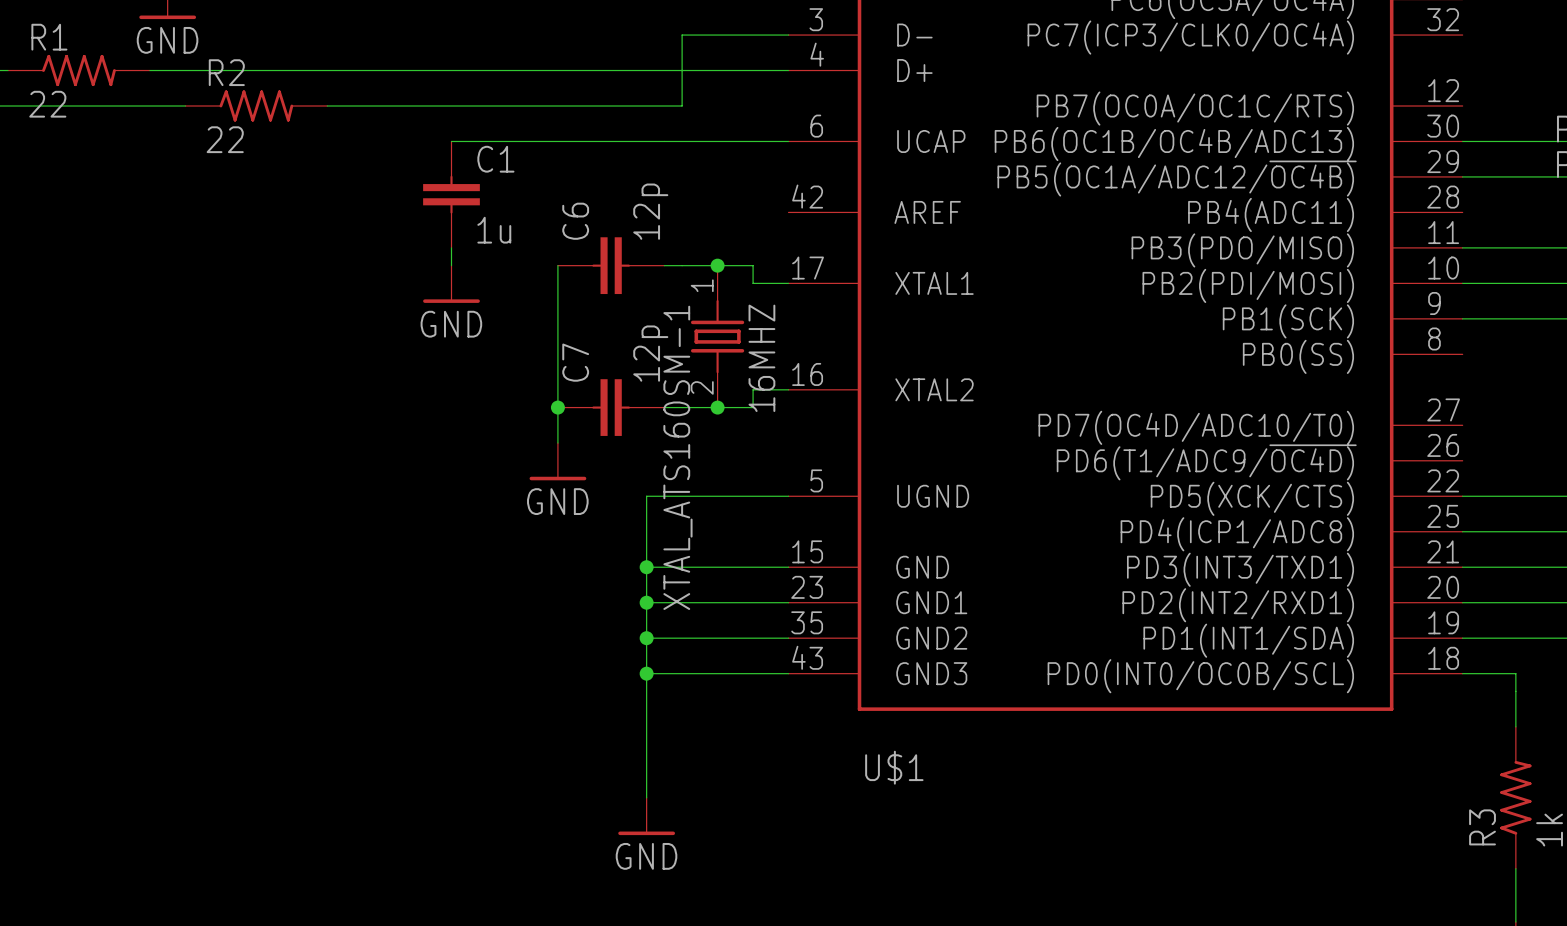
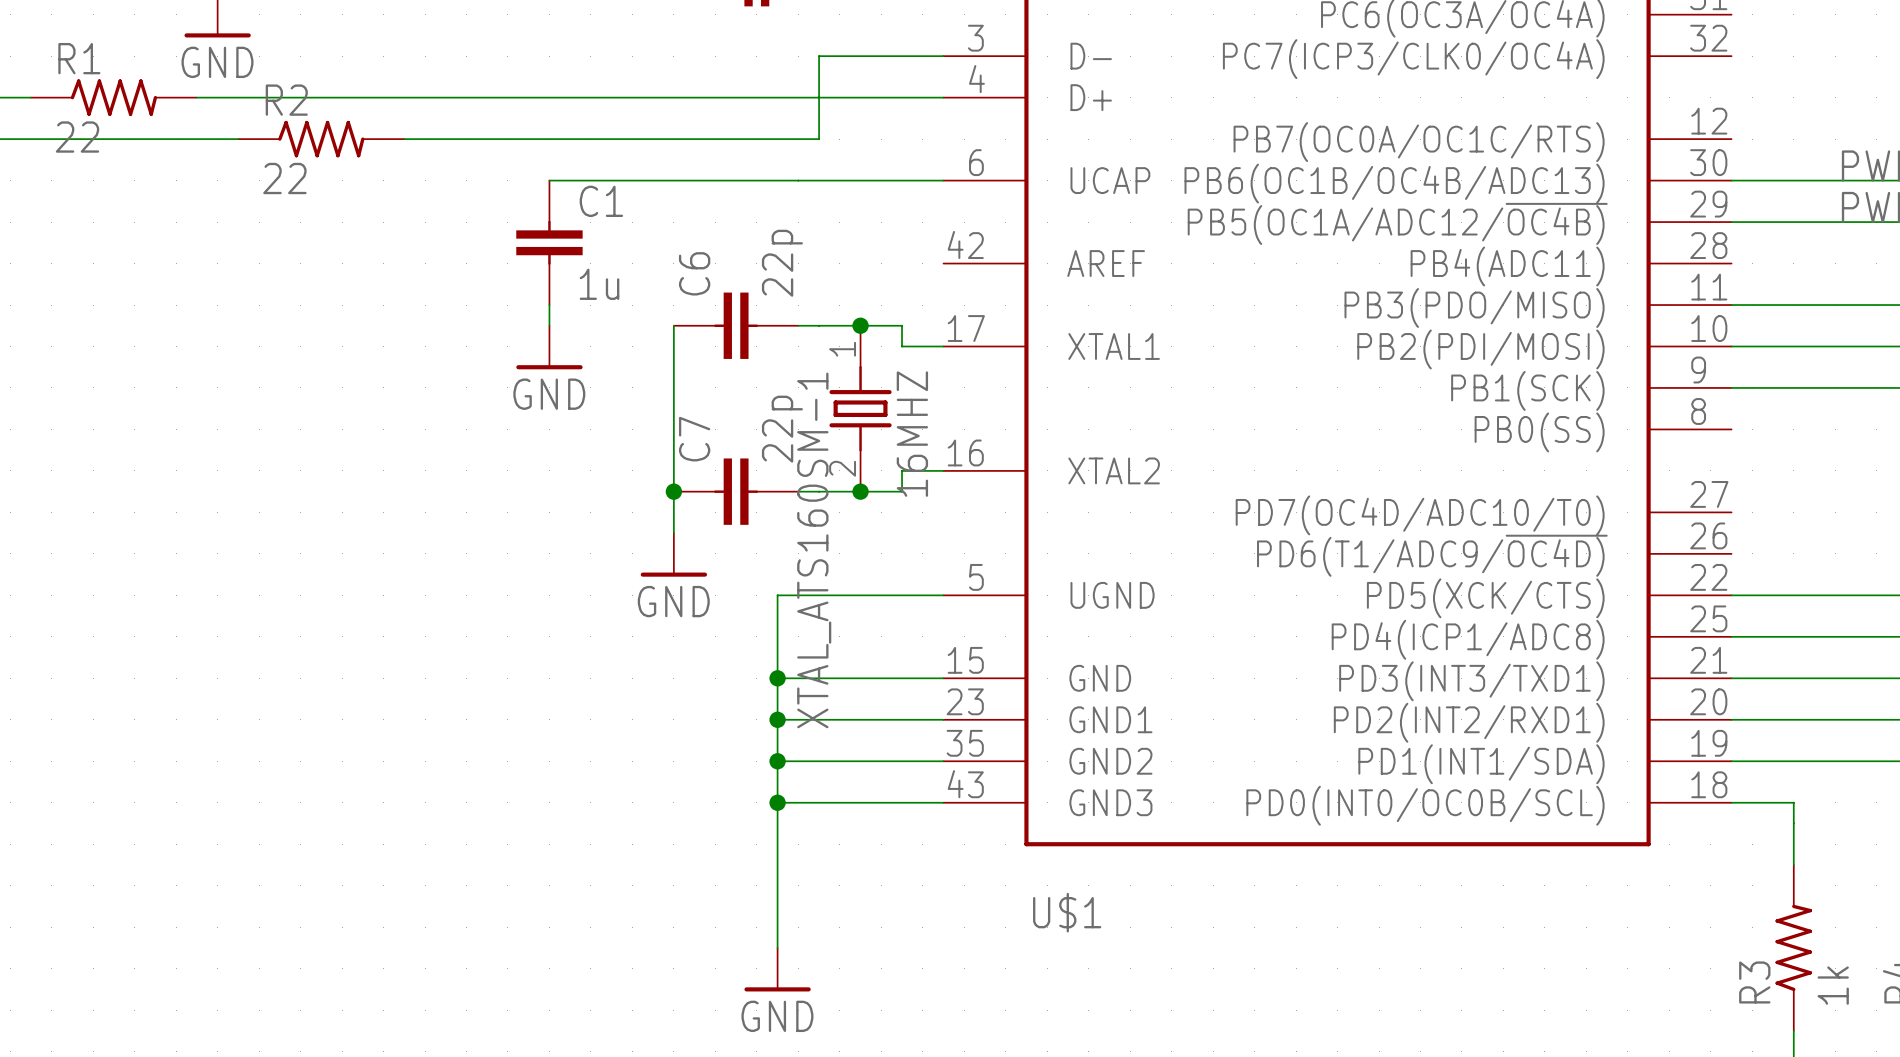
C6 value: 12p (650, 211) -> 22p (782, 263)
C7 value: 12p (650, 353) -> 22p (782, 429)

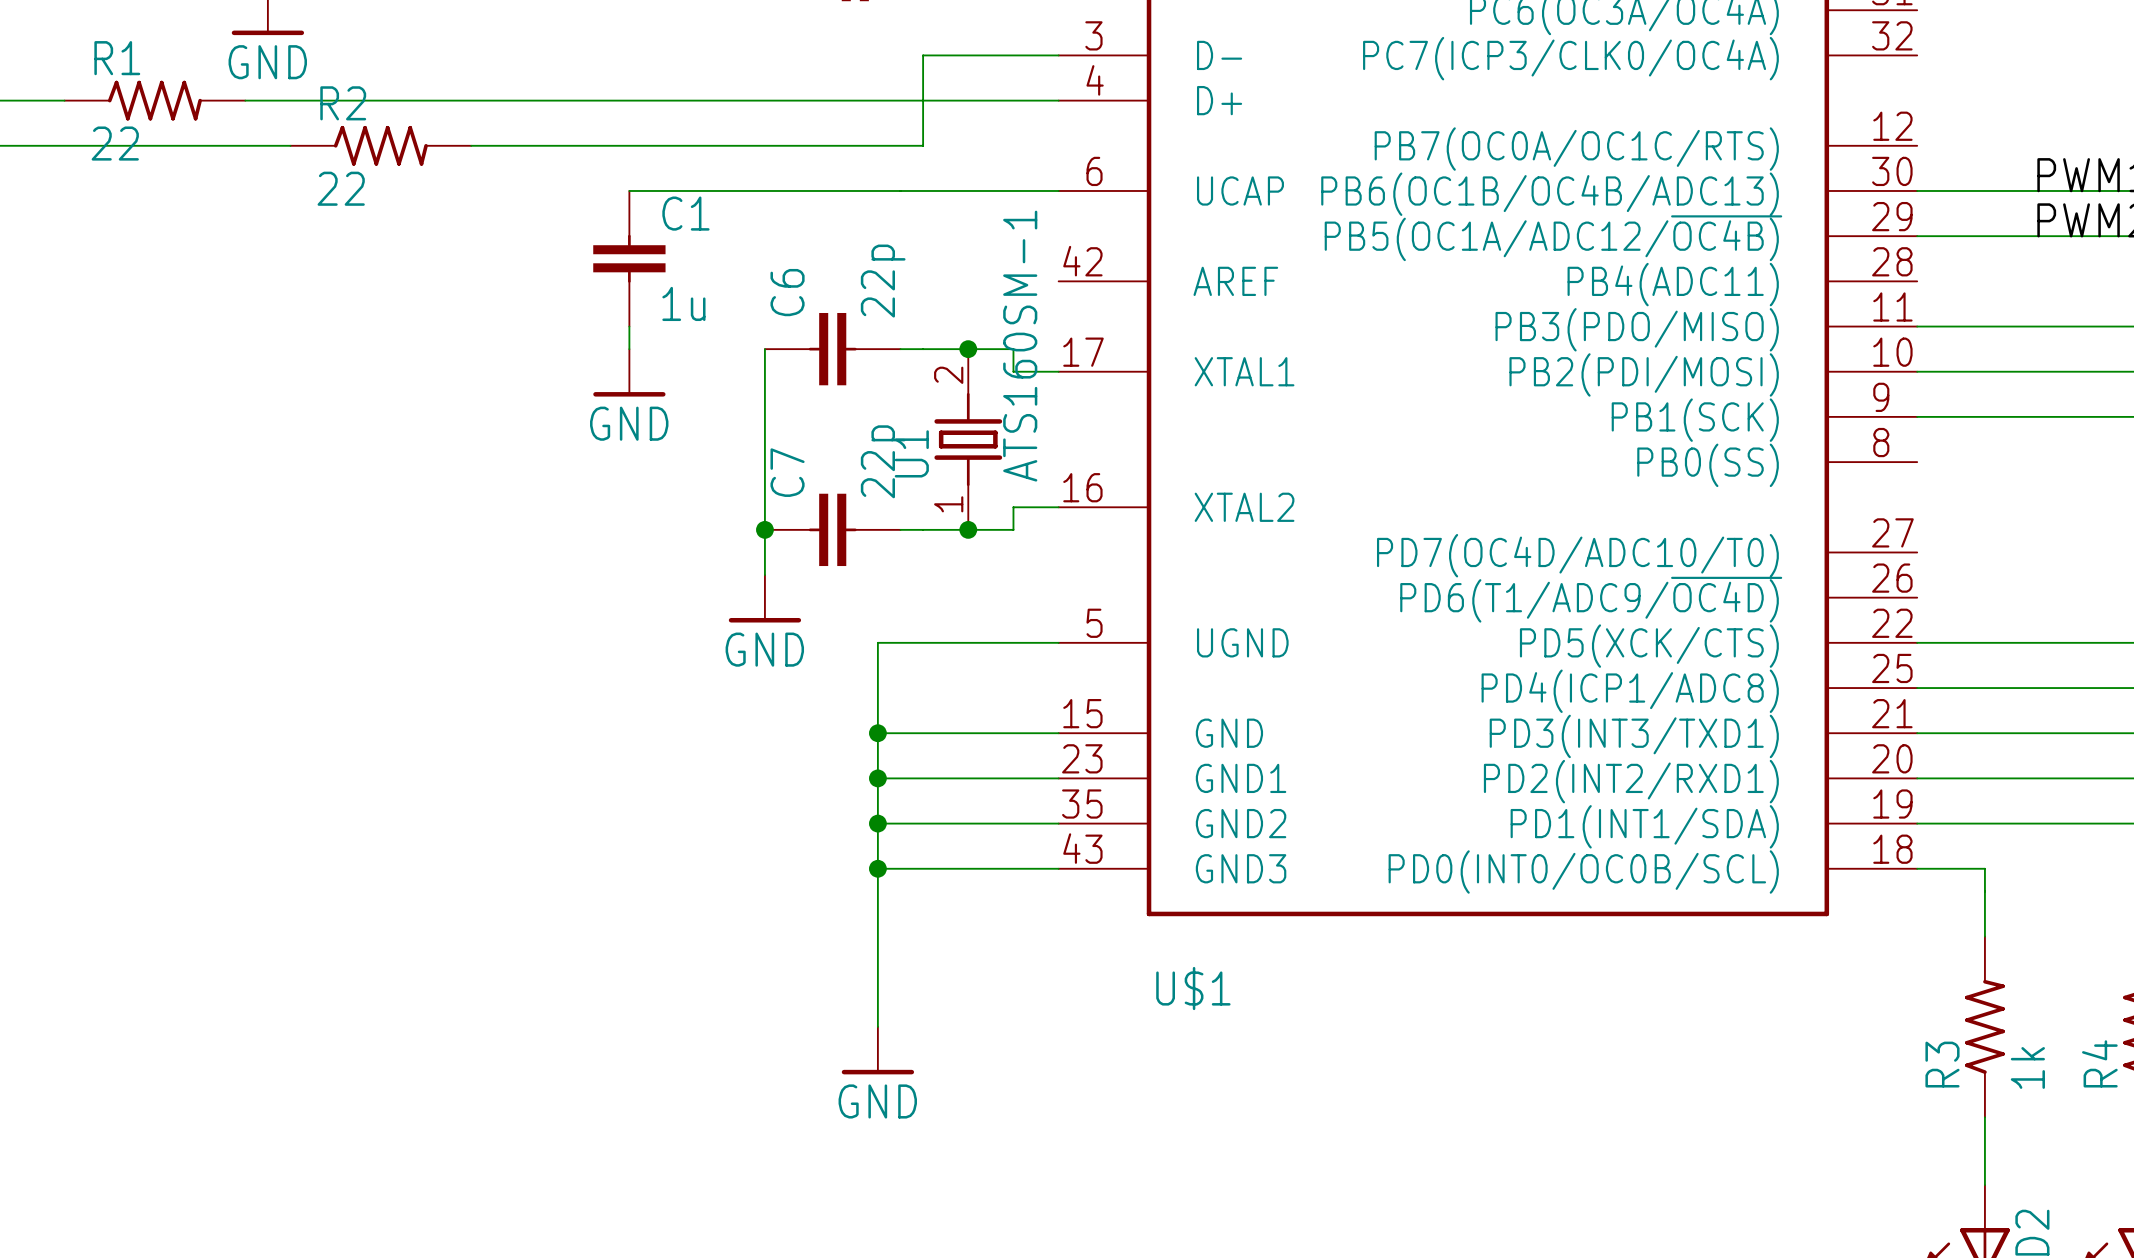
16MHZ rotation: 0° (860, 408) -> 180° (968, 439)
16MHZ name: 16MHZ (912, 434) -> U1 (911, 453)
16MHZ value: XTAL_ATS160SM-1 (814, 550) -> ATS160SM-1 (1020, 346)

